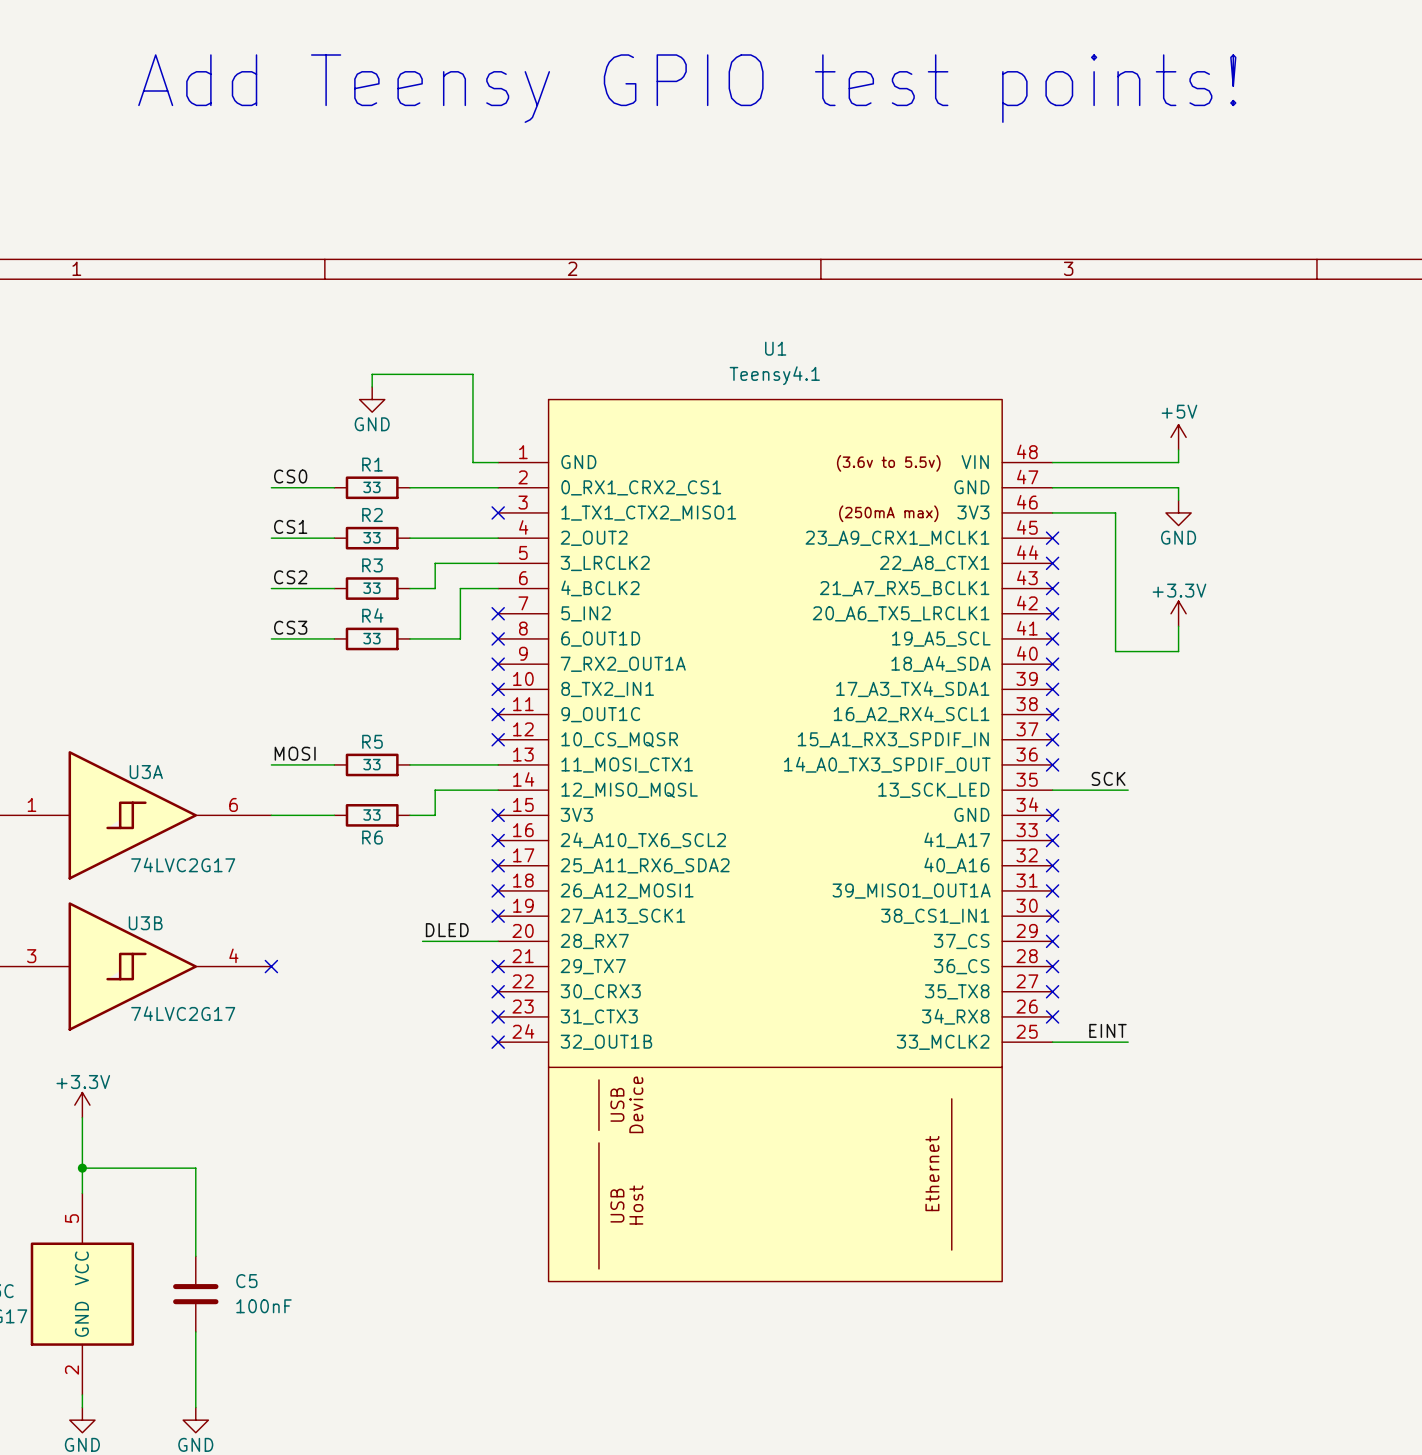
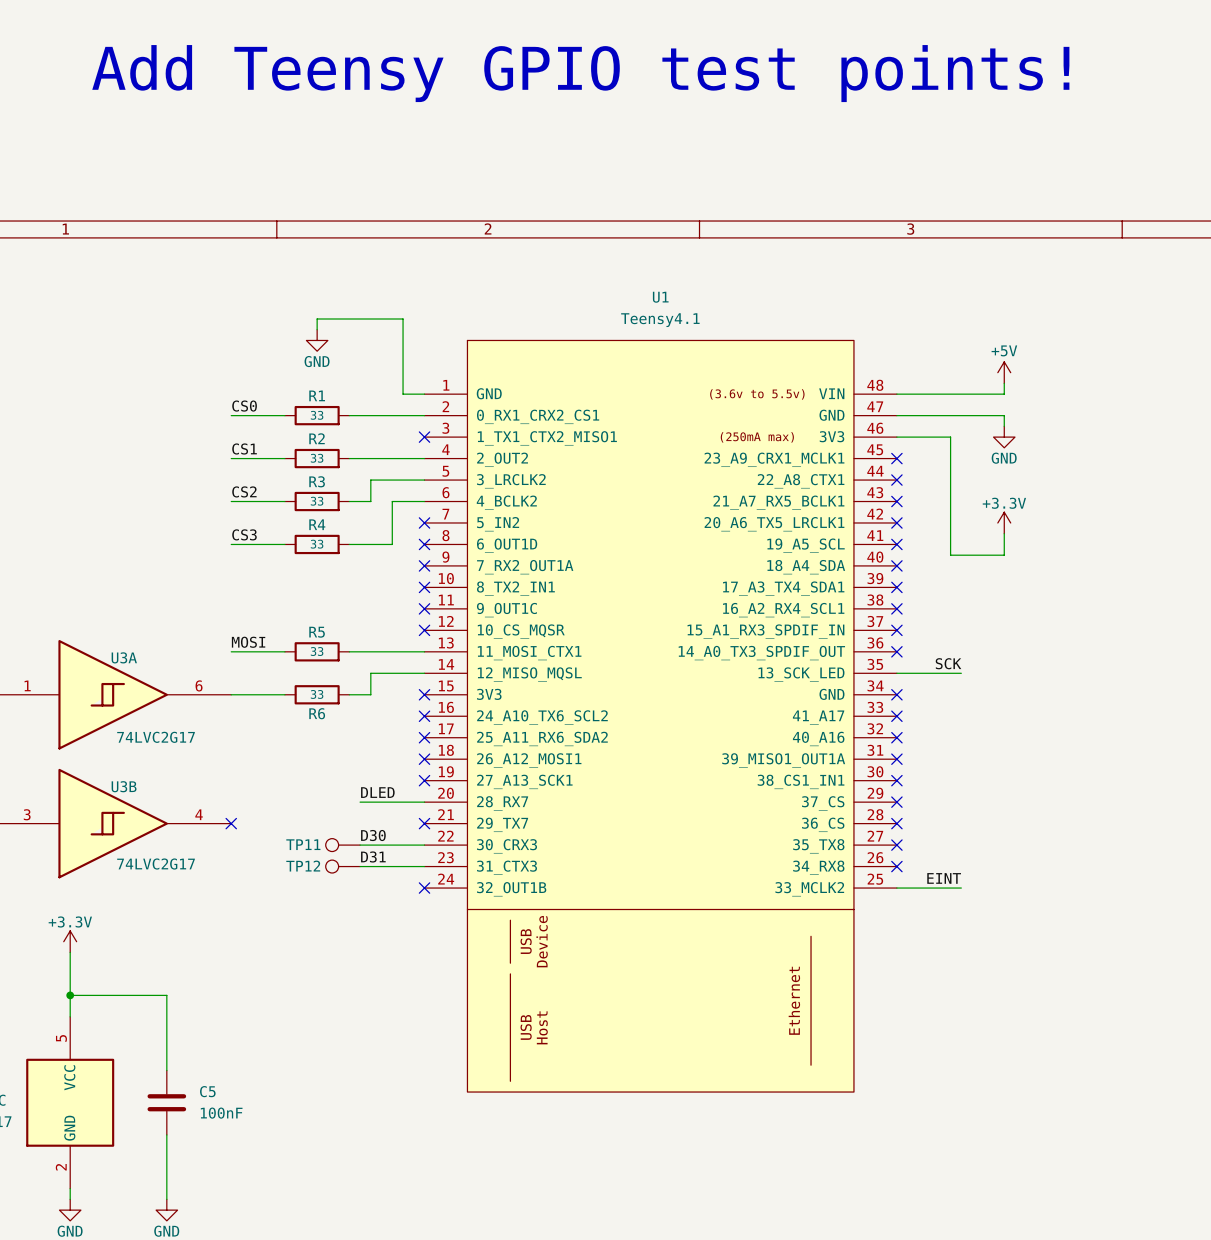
label: none -> D30 (373, 835)
TP11: none -> (342, 845)
wire: none -> (360, 845) (424, 845)
no-connect mark: (498, 991) -> none
label: none -> D31 (373, 856)
TP12: none -> (342, 866)
wire: none -> (360, 866) (424, 866)
no-connect mark: (498, 1016) -> none

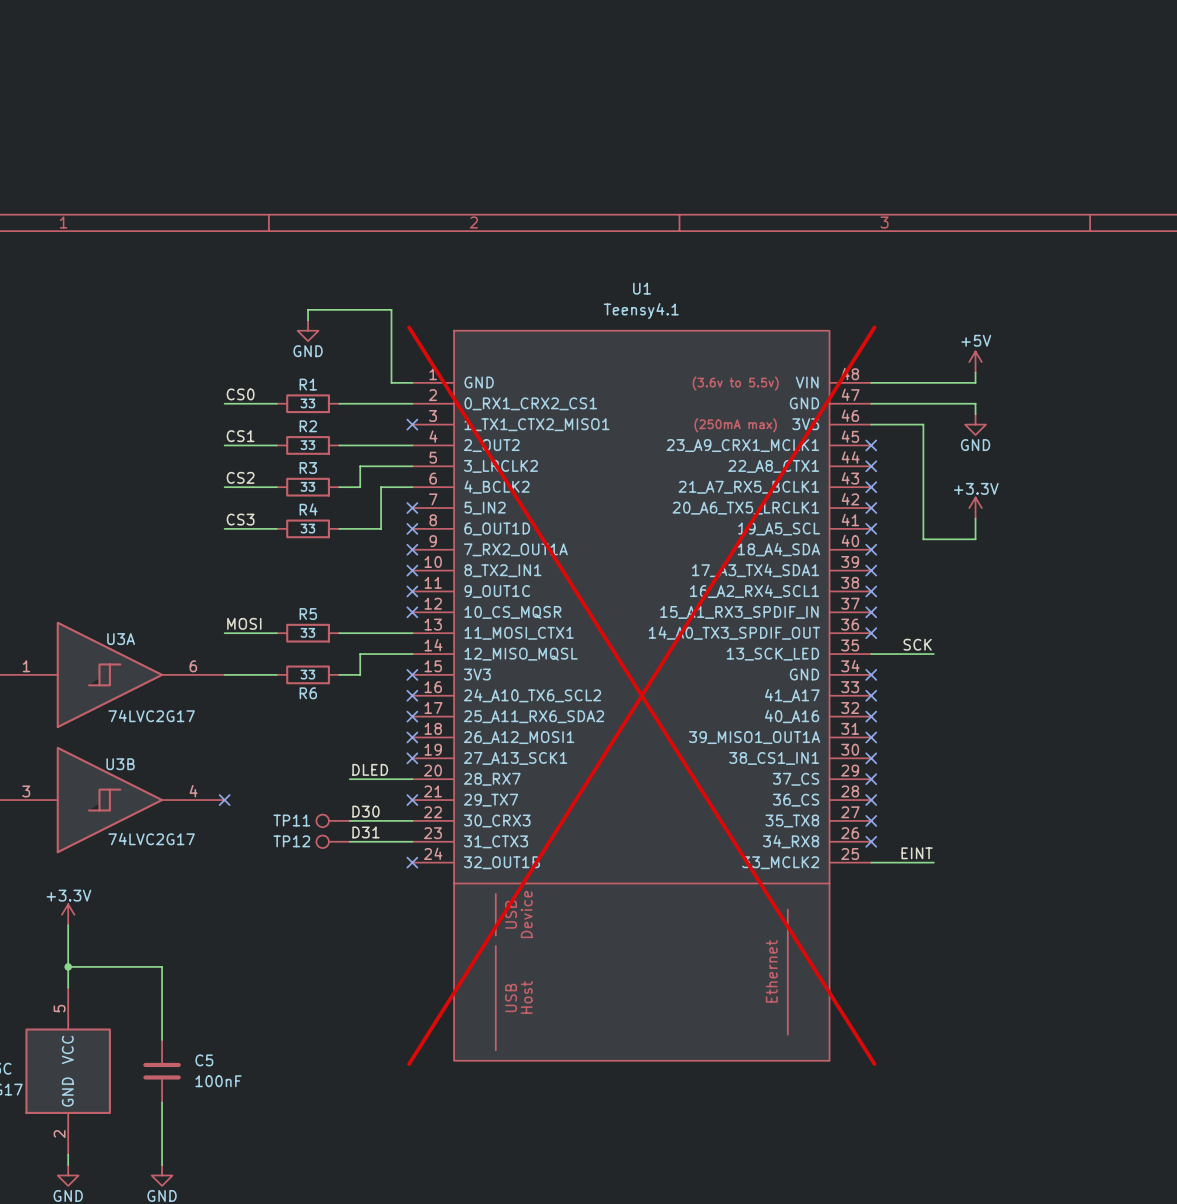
text: Add Teensy GPIO test points! (580, 73) -> none
U1 do-not-place cross: none -> (641, 695)

